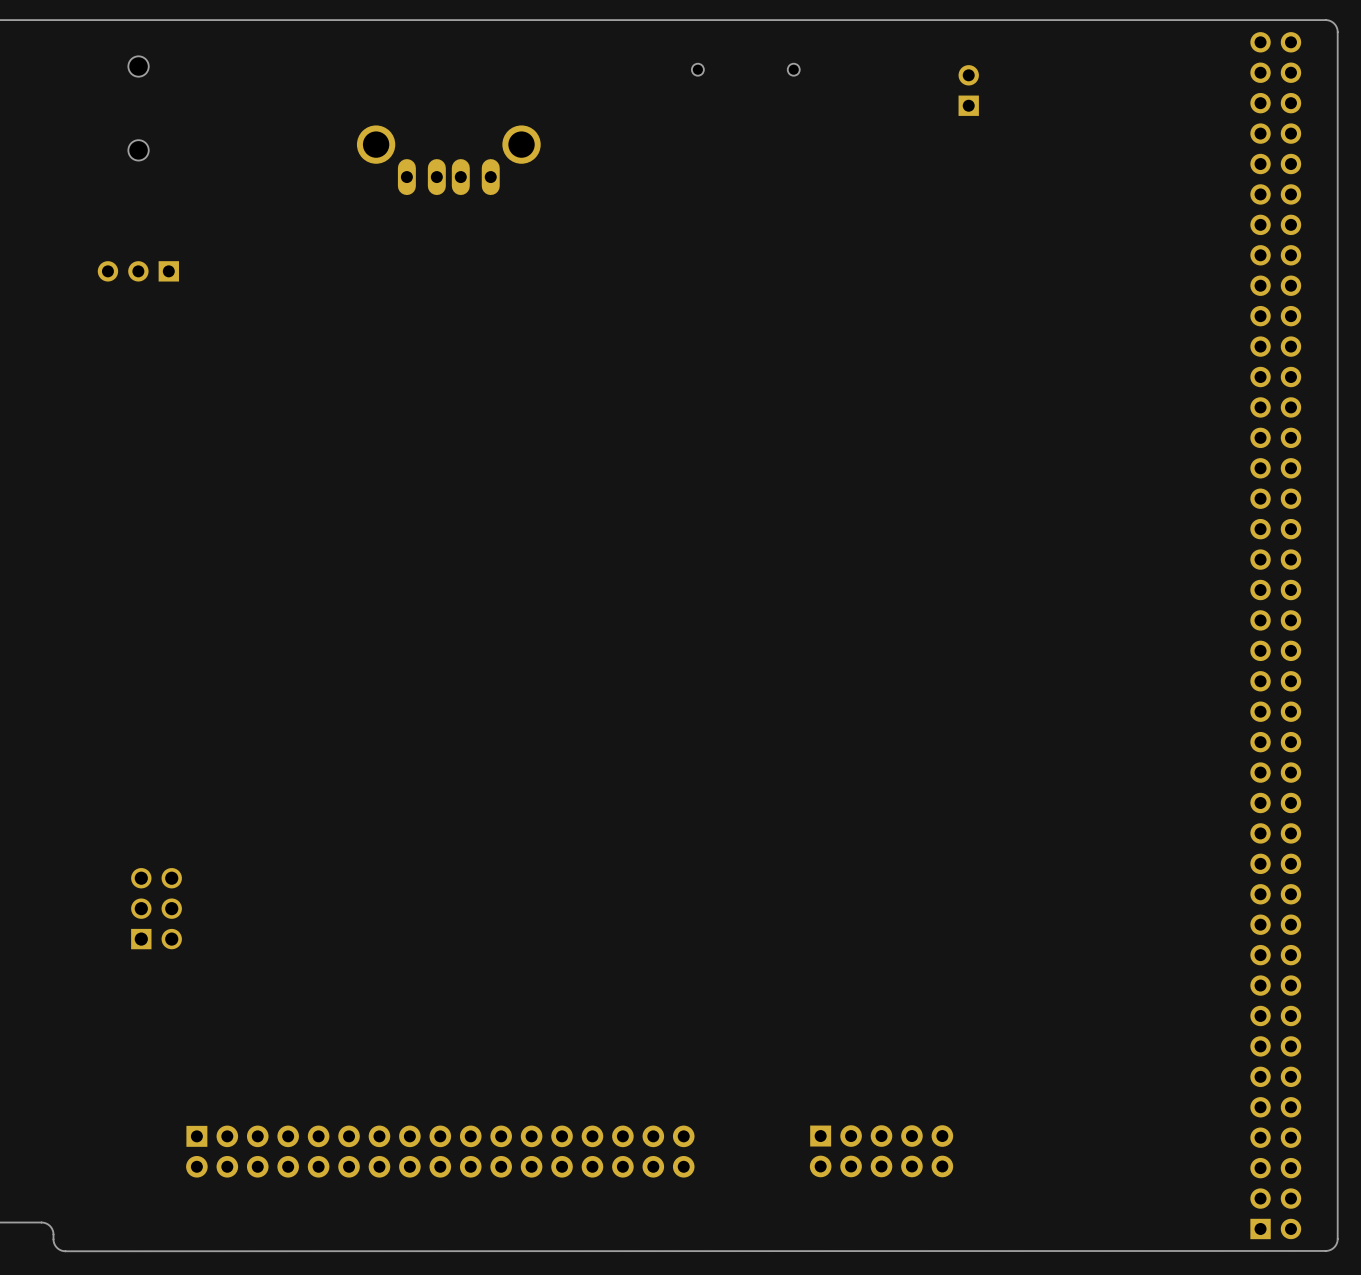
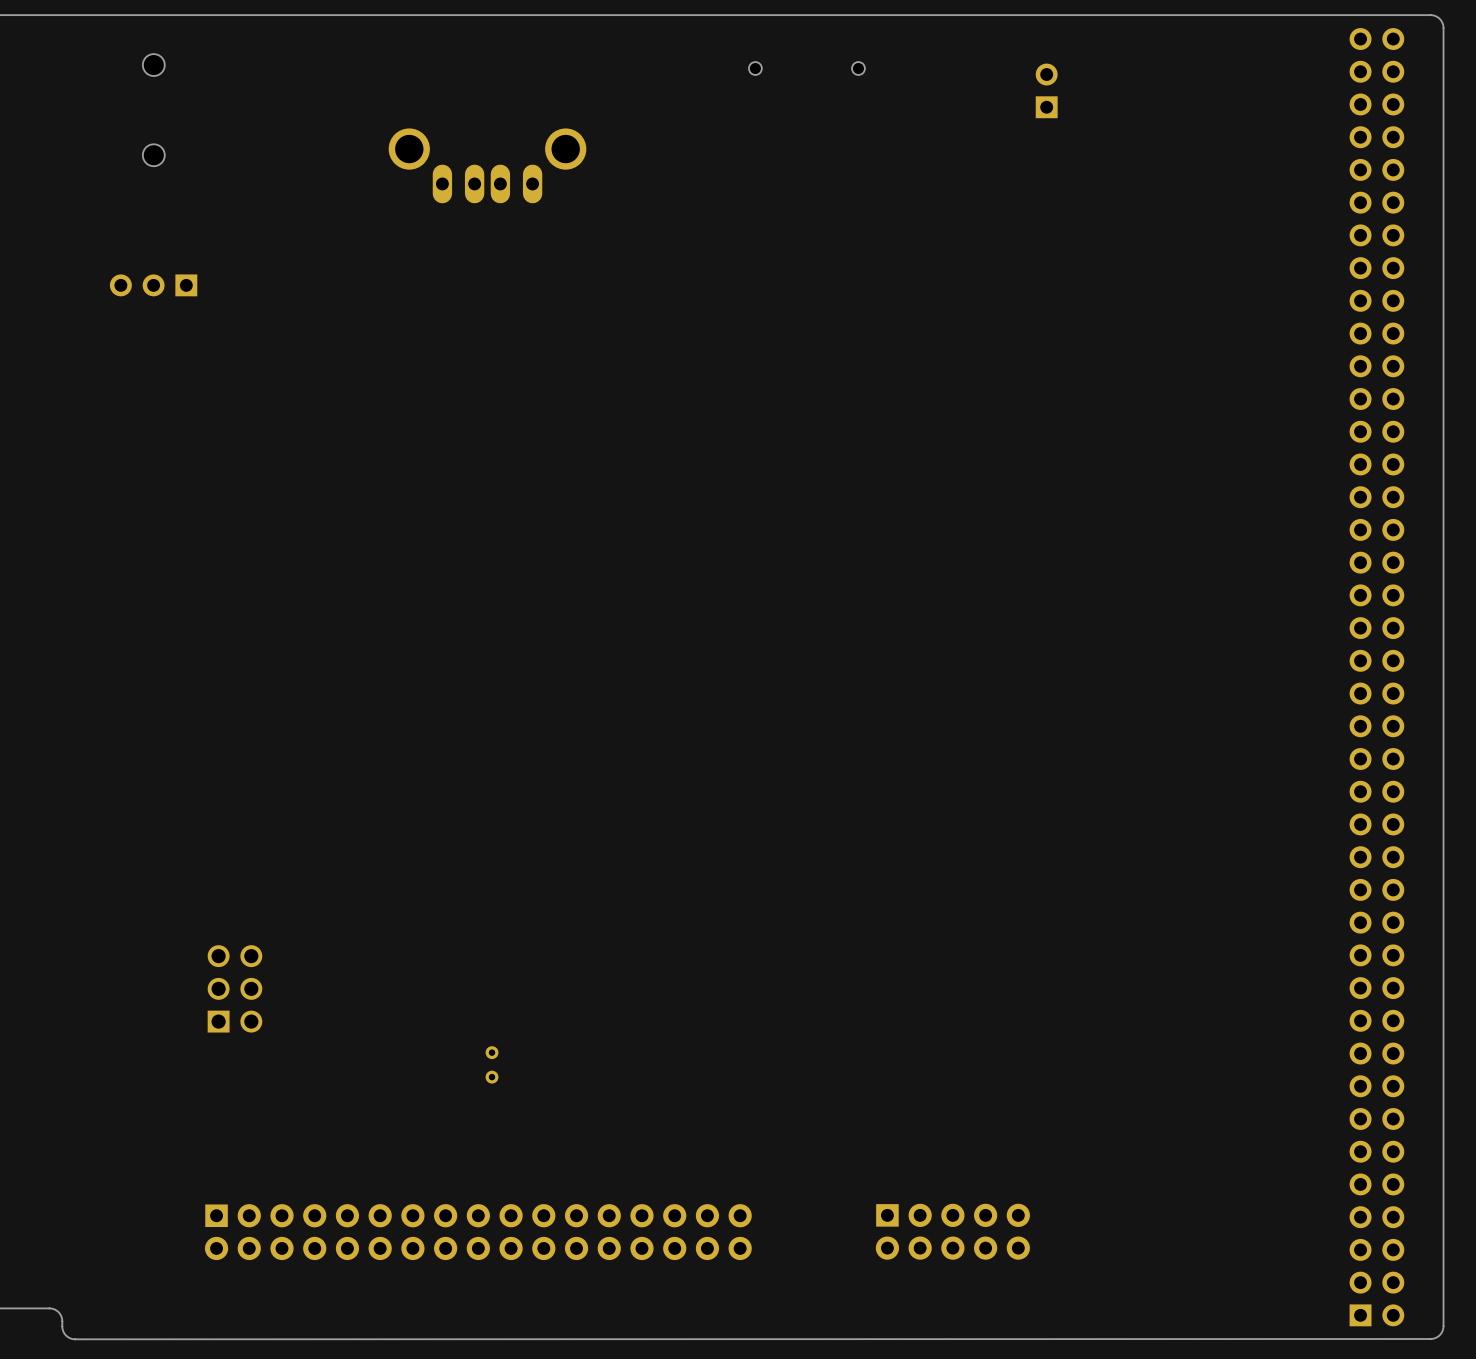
part position: (156, 908) -> (234, 988)
part: none -> (492, 1064)

